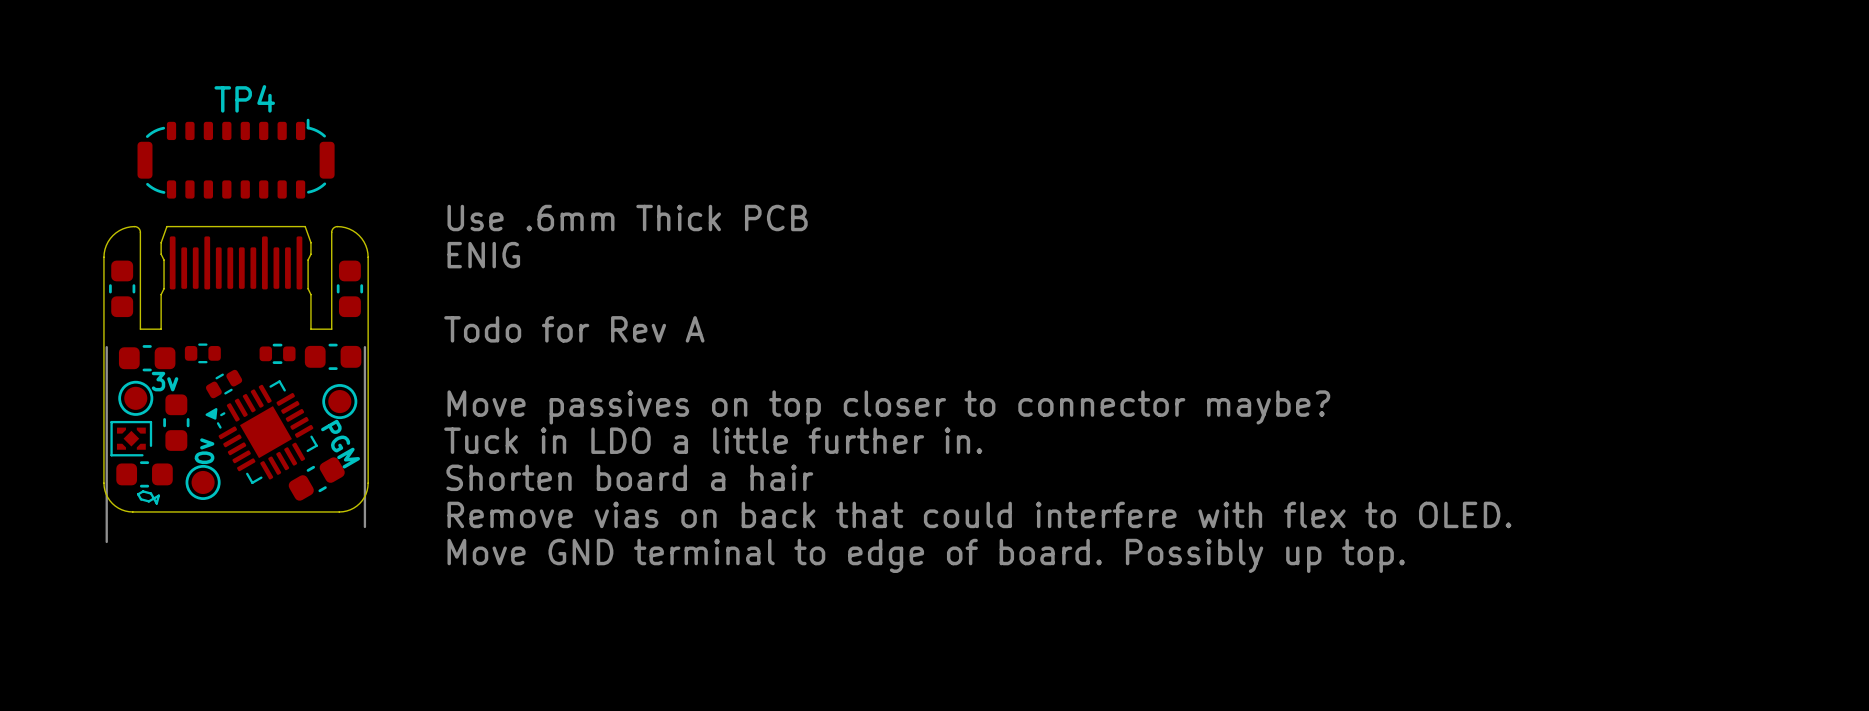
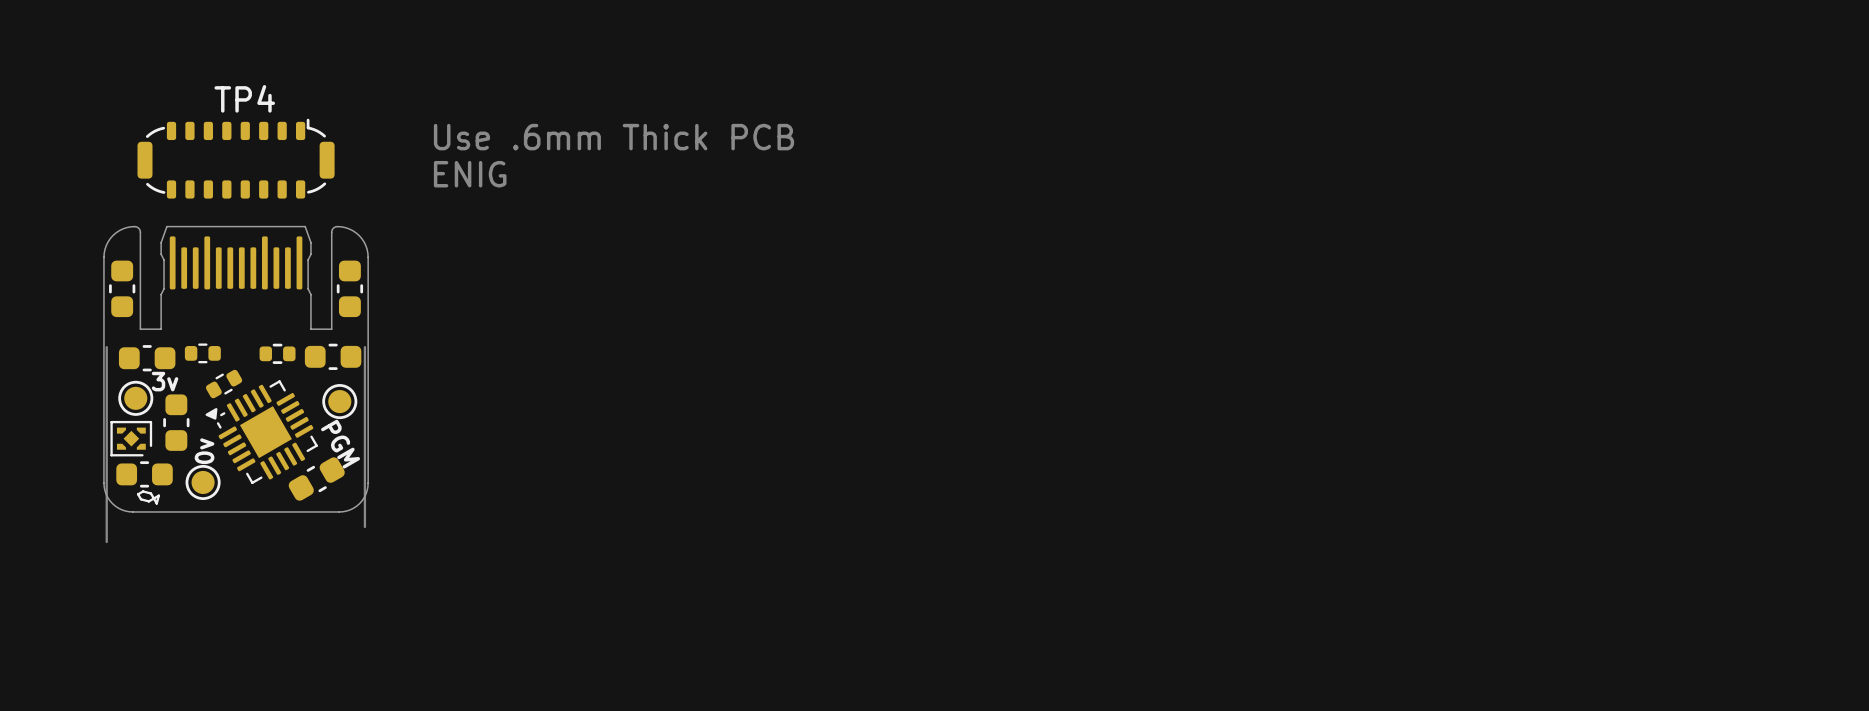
text position: Use .6mm Thick PCB (627, 218) -> Use .6mm Thick PCB (613, 137)
text position: ENIG (483, 255) -> ENIG (470, 174)
text: Todo for Rev A (574, 329) -> none
text: Move passives on top closer to connector maybe? (888, 407) -> none
text: Tuck in LDO a little further in. (713, 440) -> none
text: Shorten board a hair (629, 477) -> none
text: Remove vias on back that could interfere with flex to OLED. (979, 514) -> none
text: Move GND terminal to edge of board. Possibly up top. (926, 555) -> none

